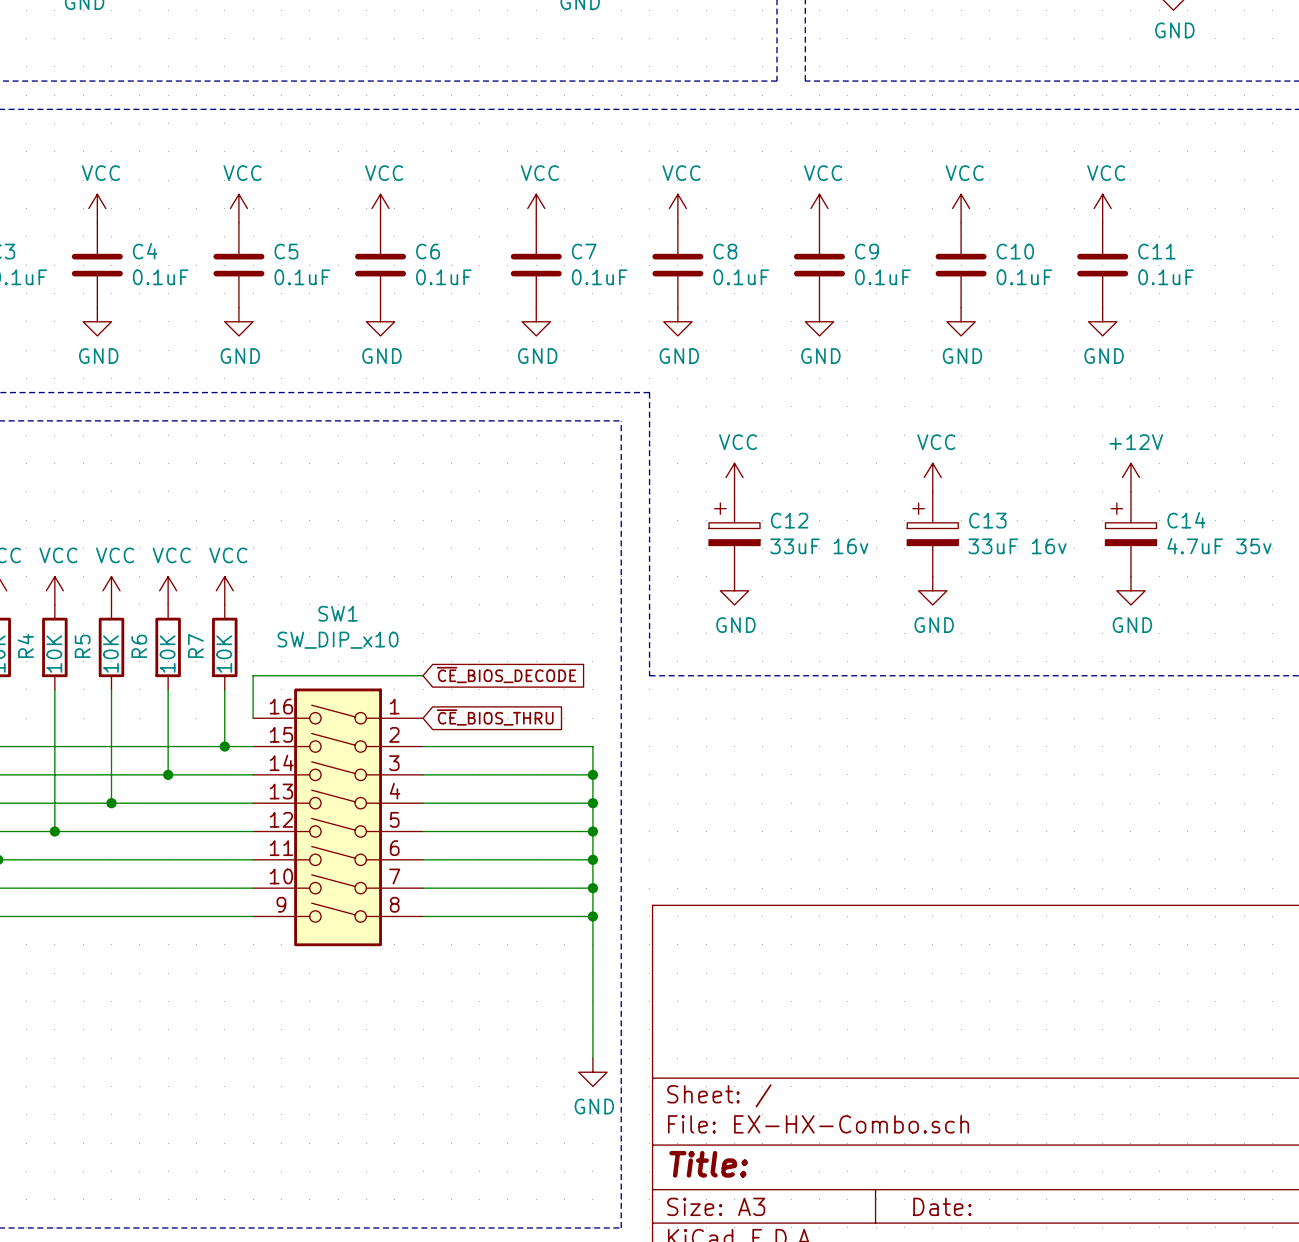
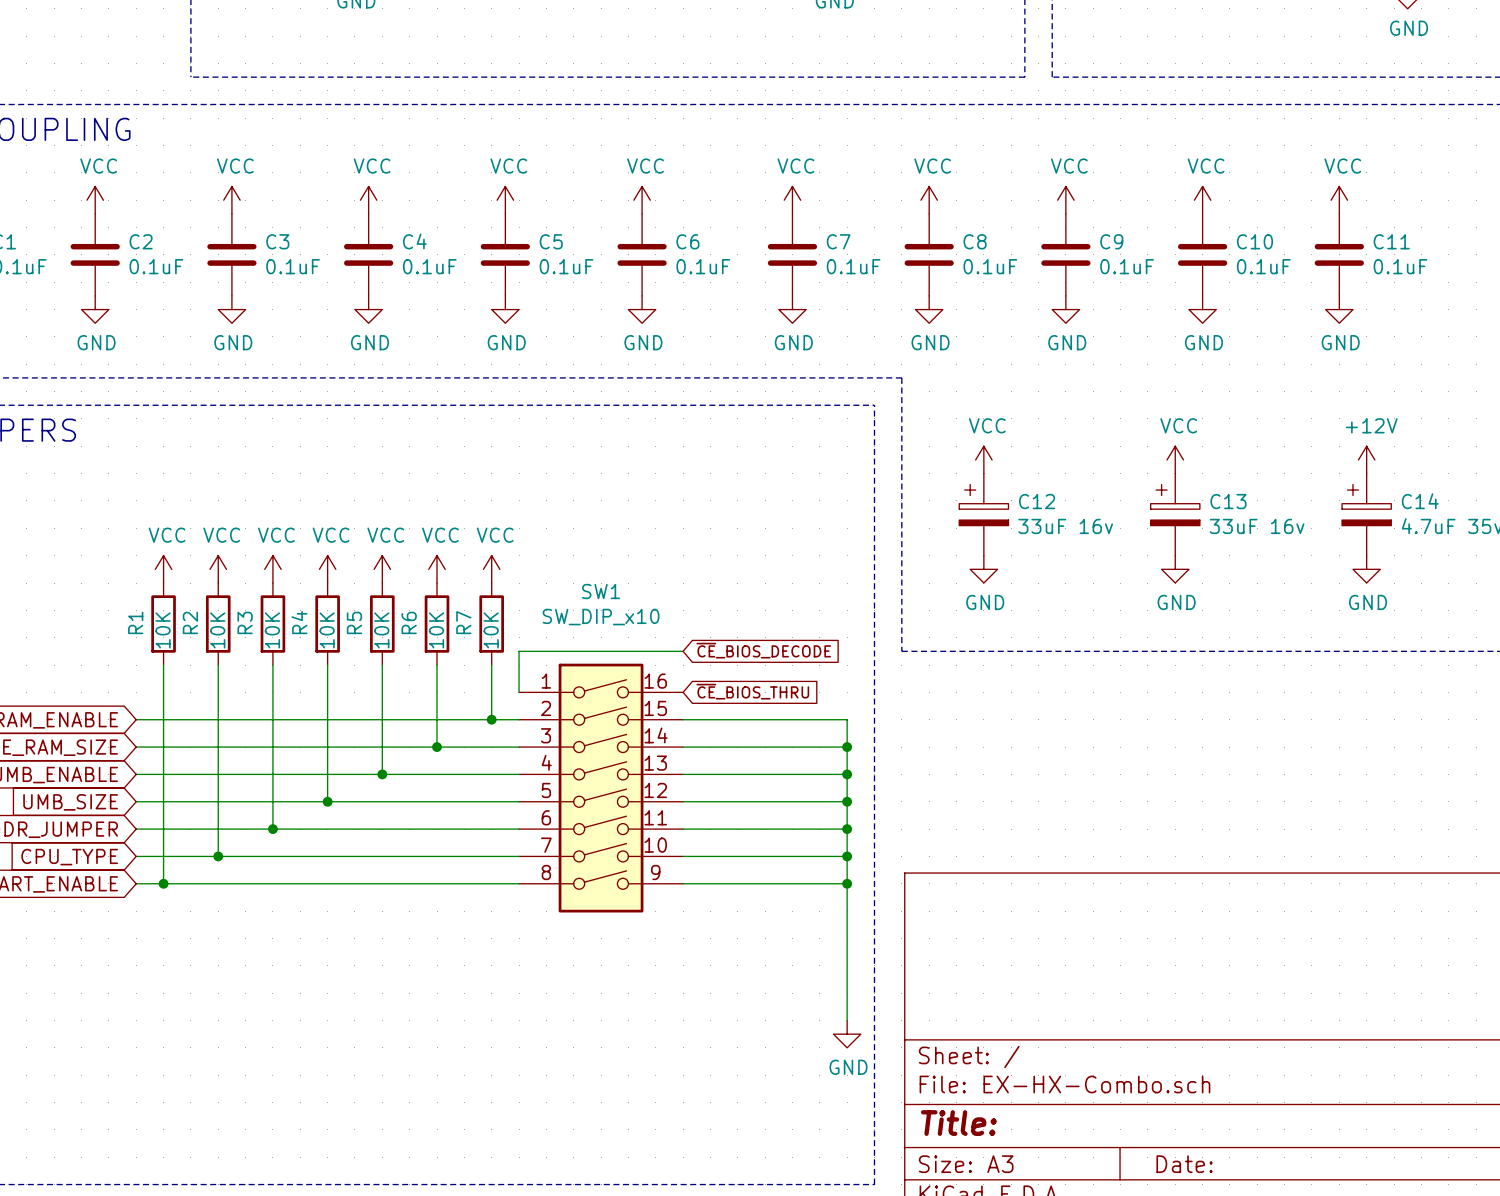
SW1 flip: as is (338, 817) -> left-right (601, 788)

